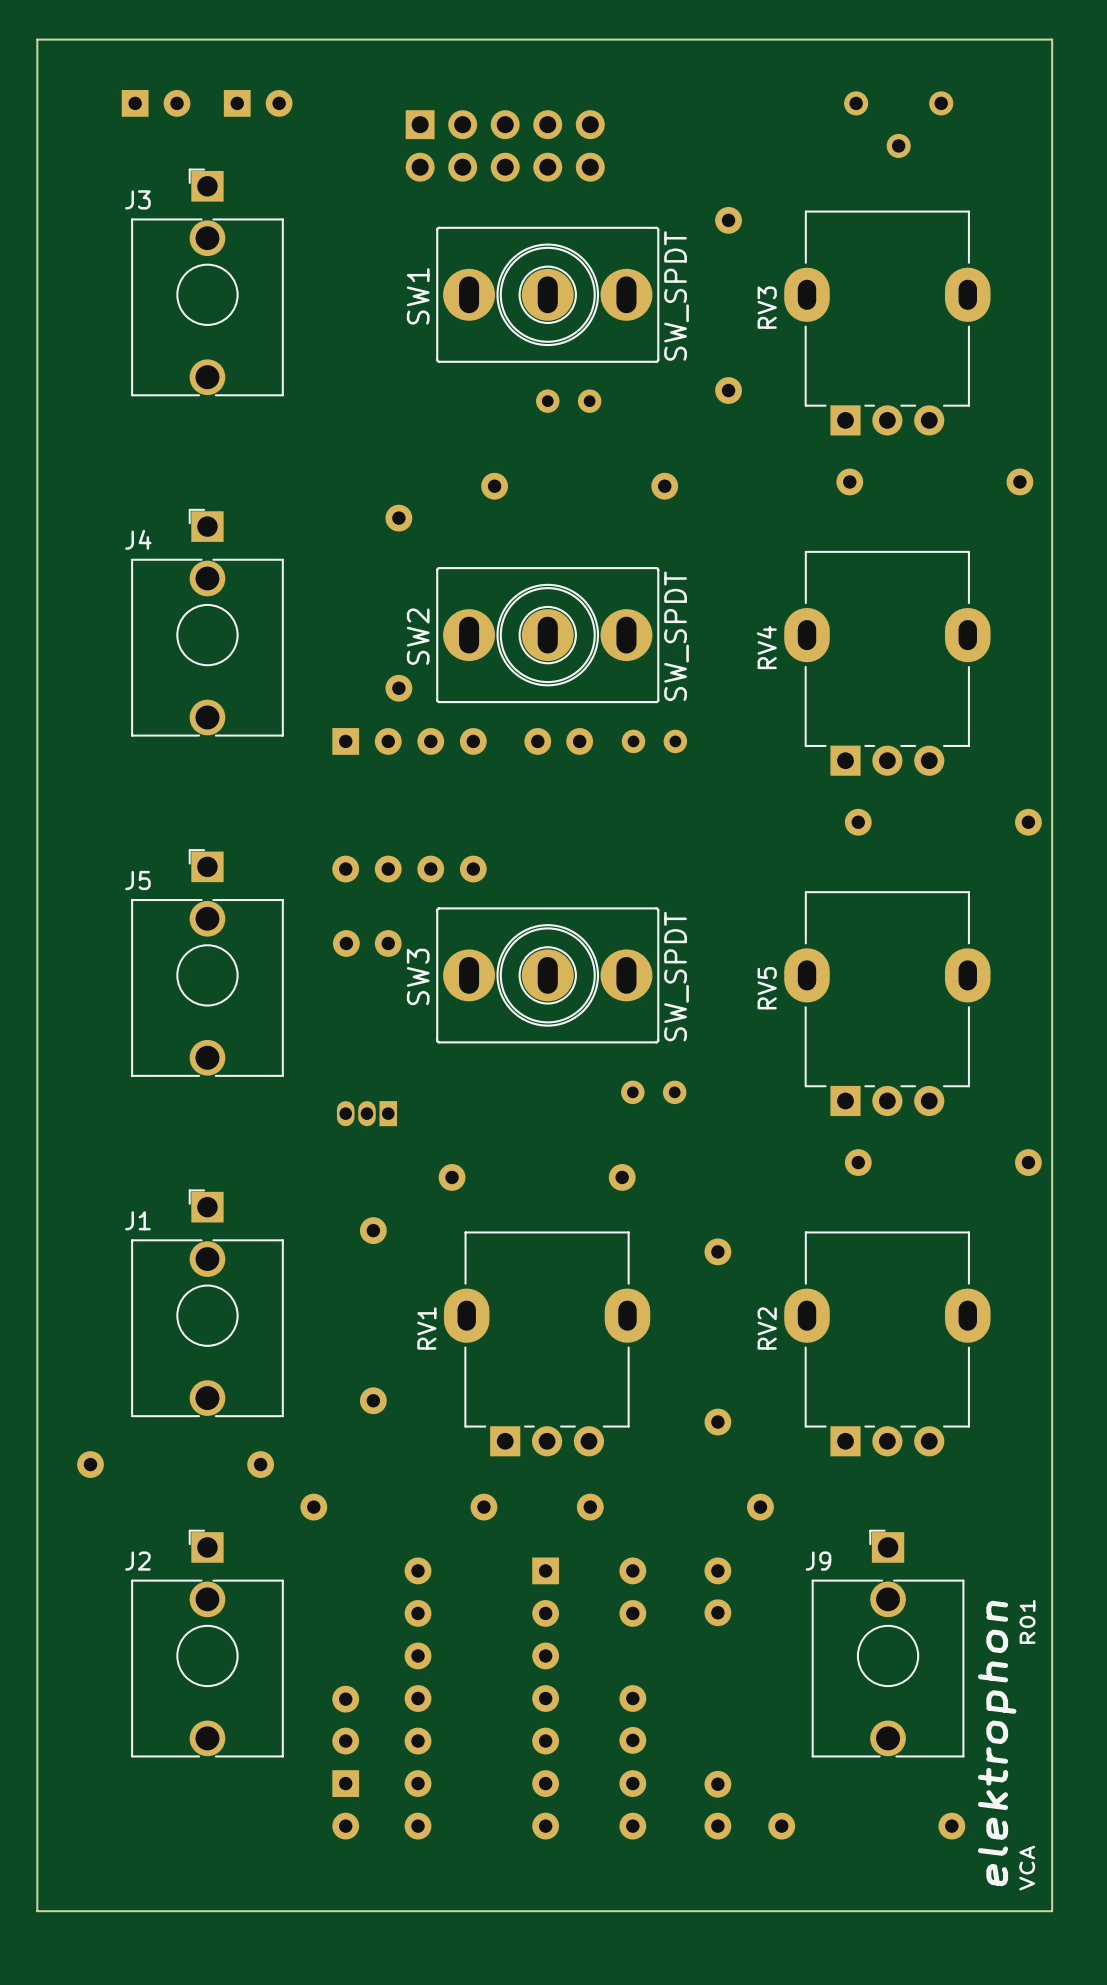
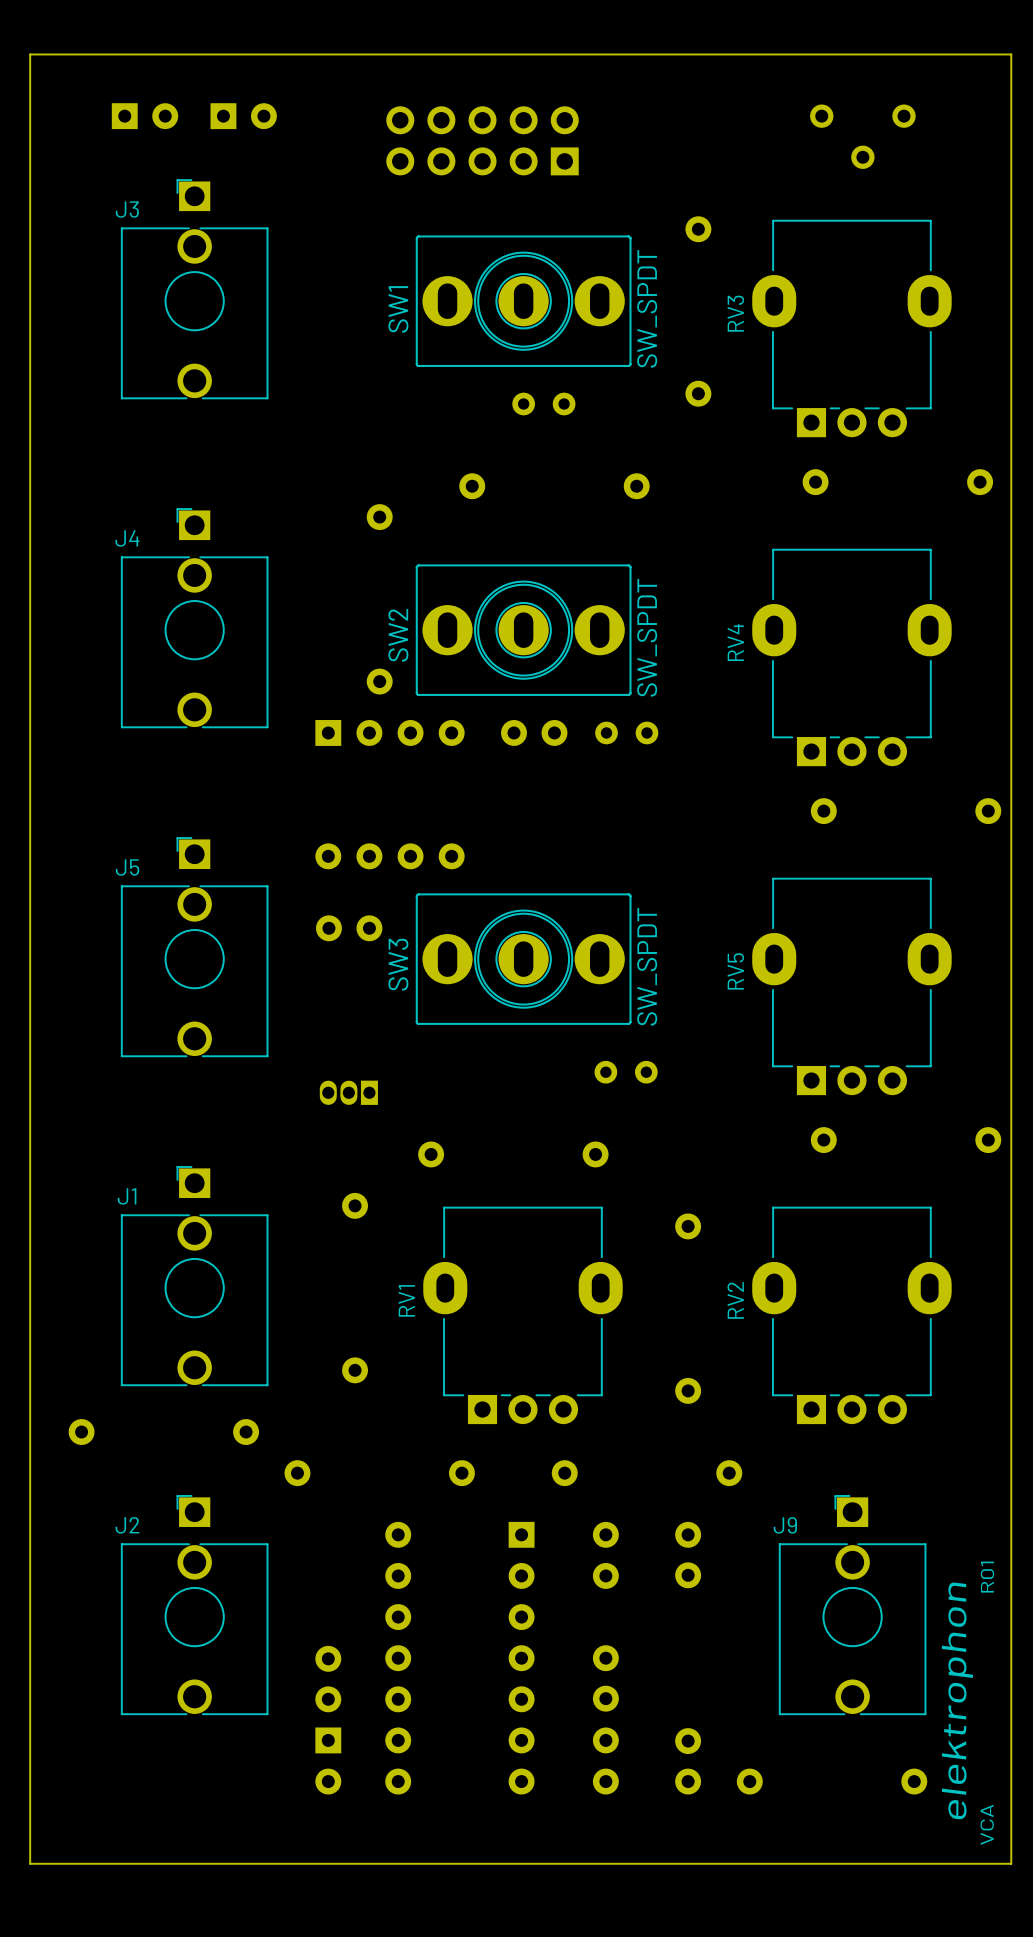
part rotation: 0° (505, 145) -> 180° (482, 140)

